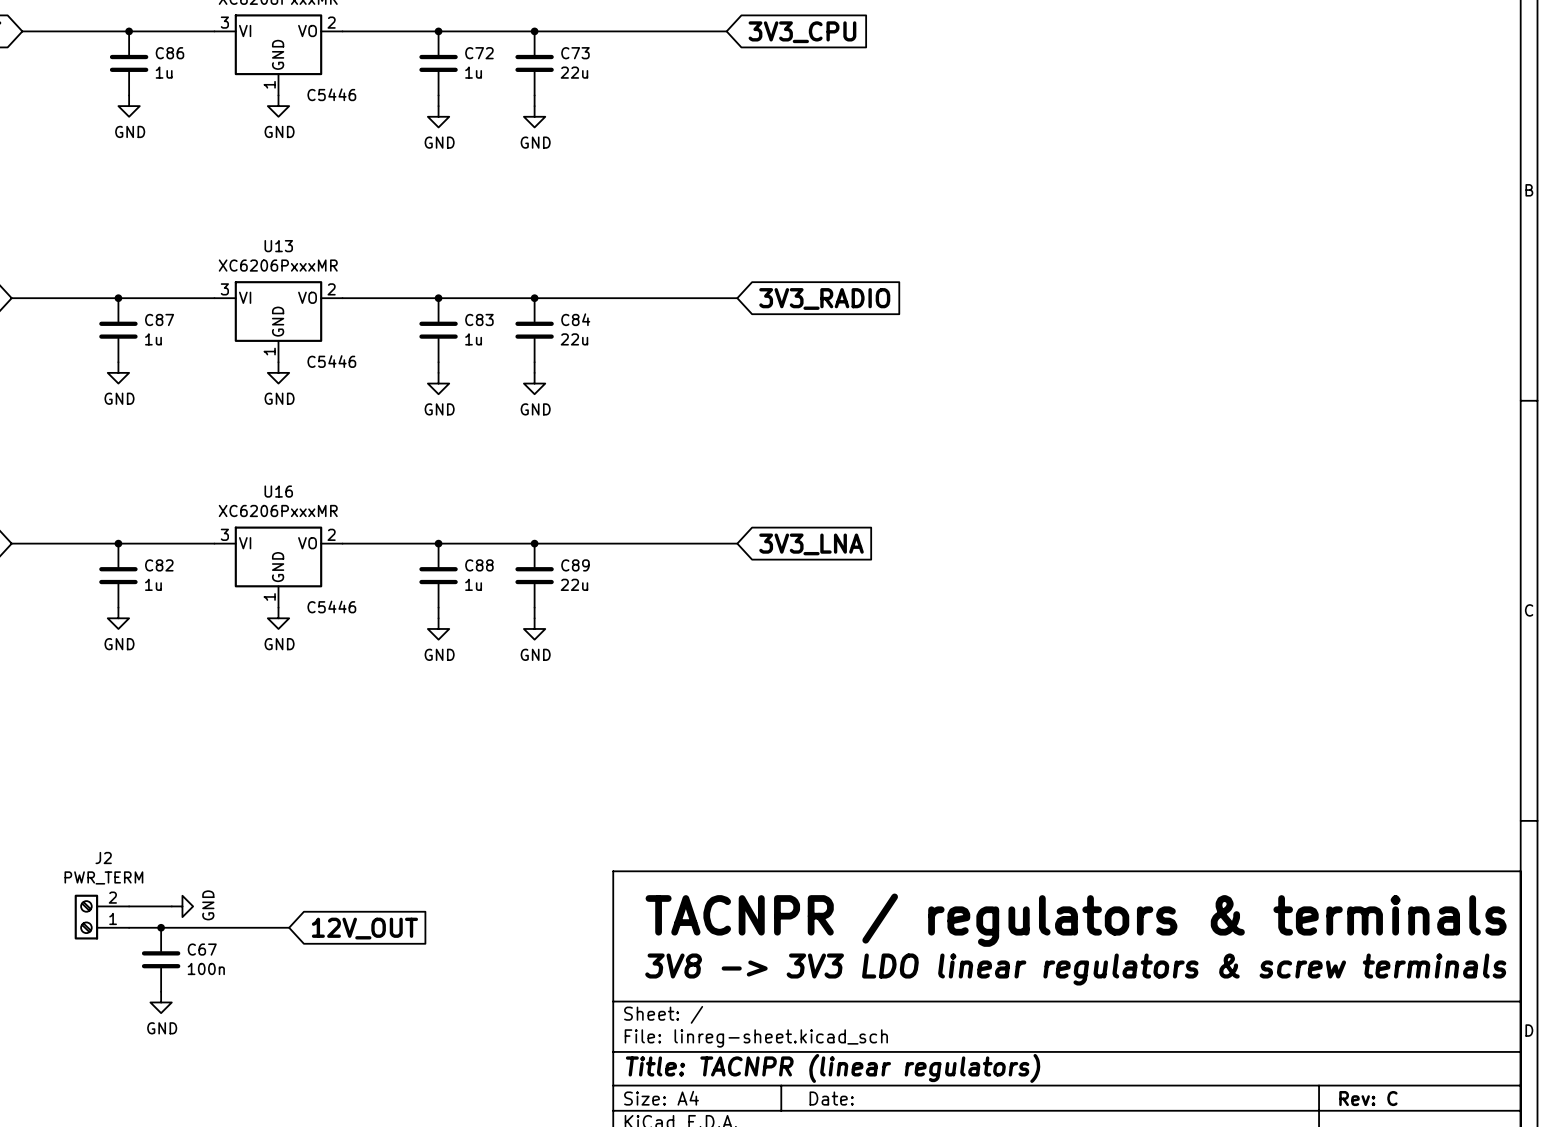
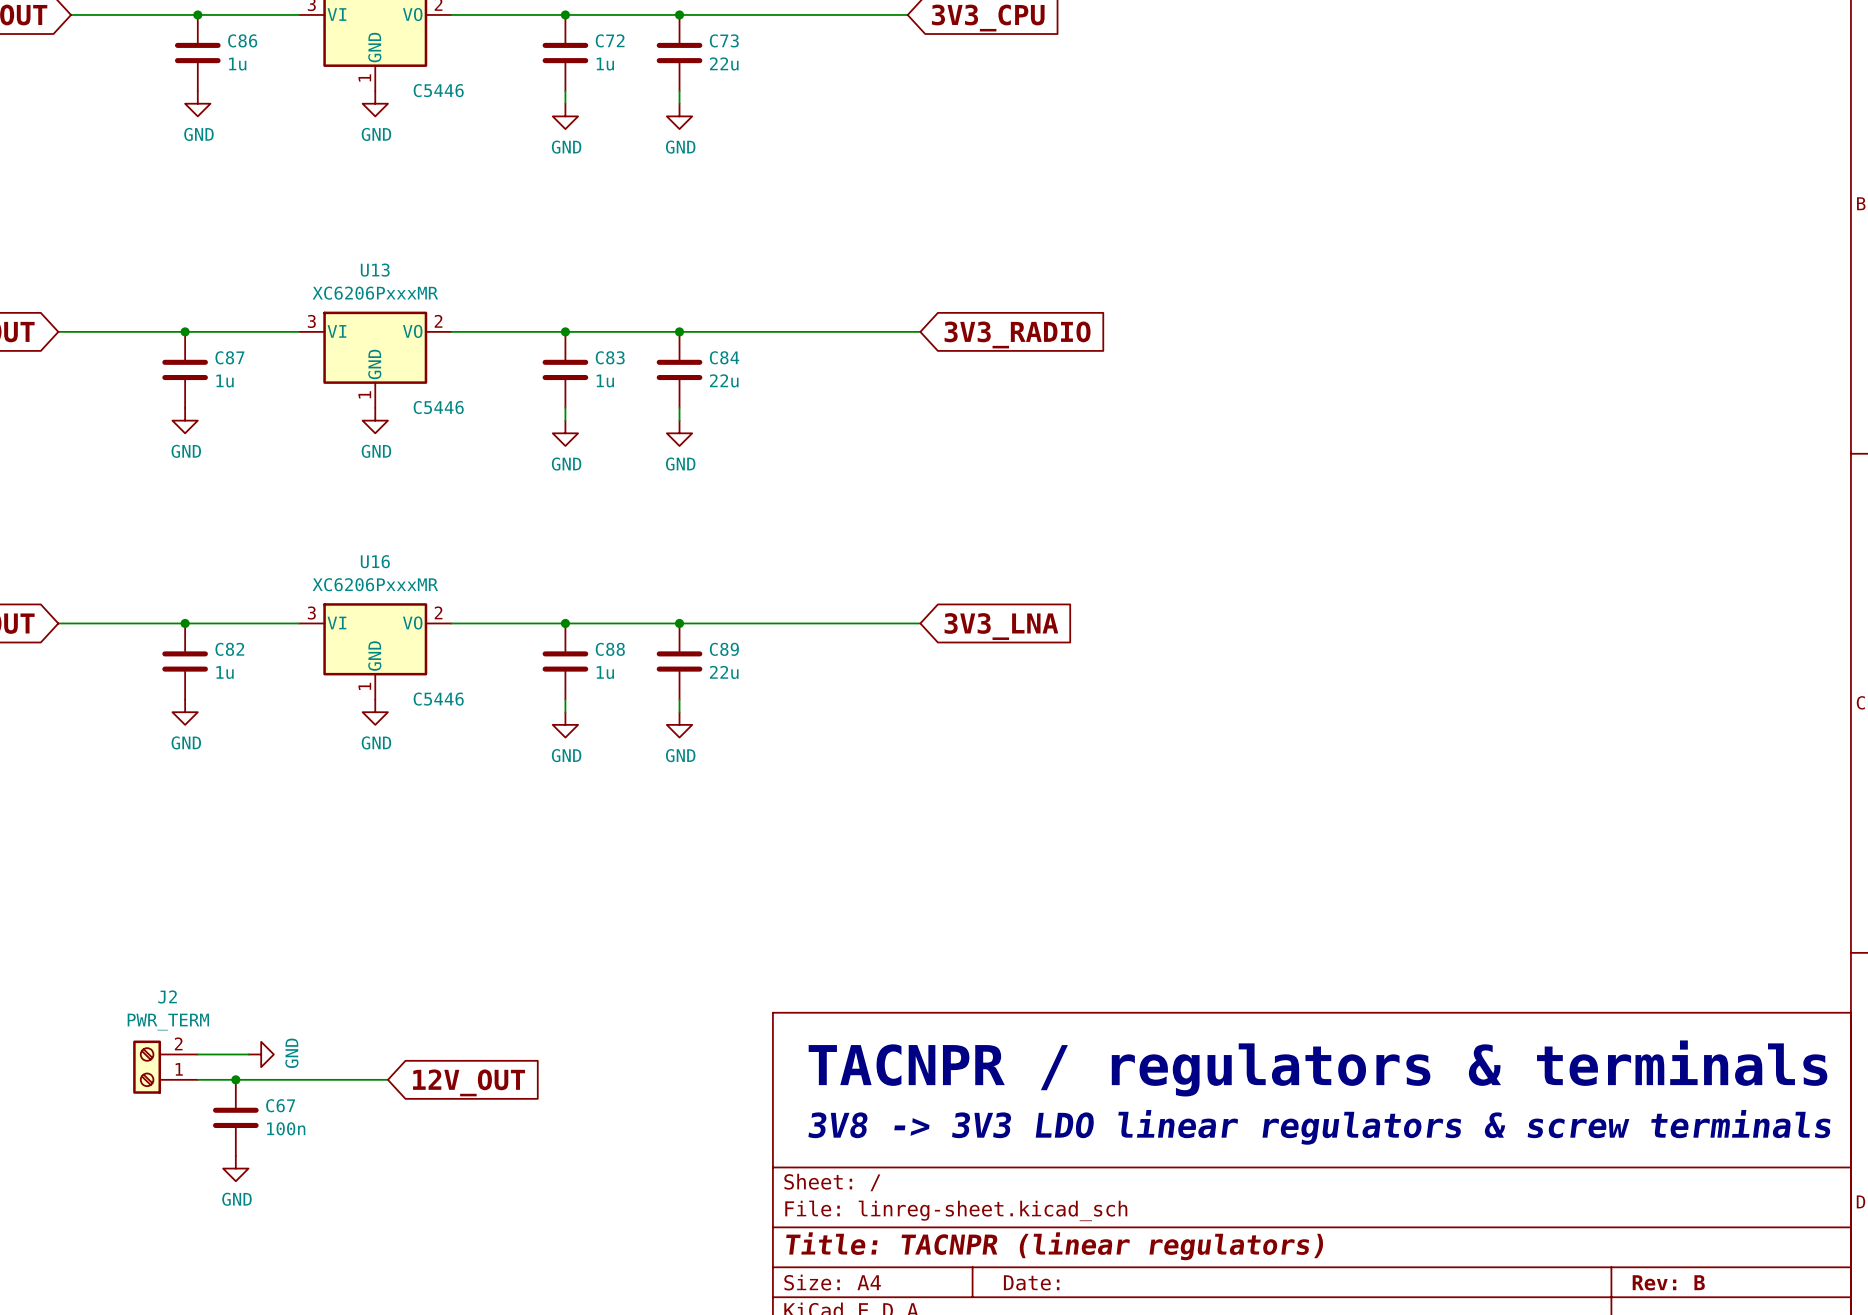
title block: Rev: C (1368, 1098) -> Rev: B (1668, 1282)

